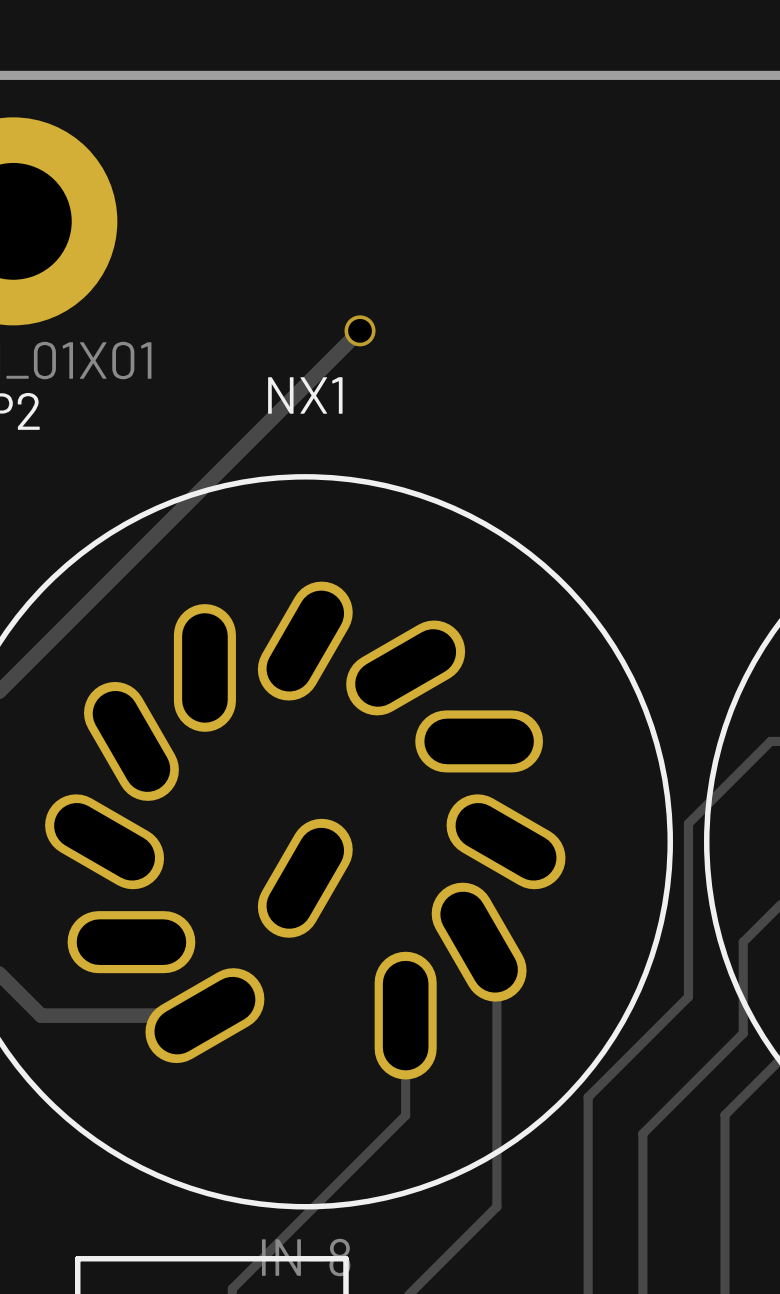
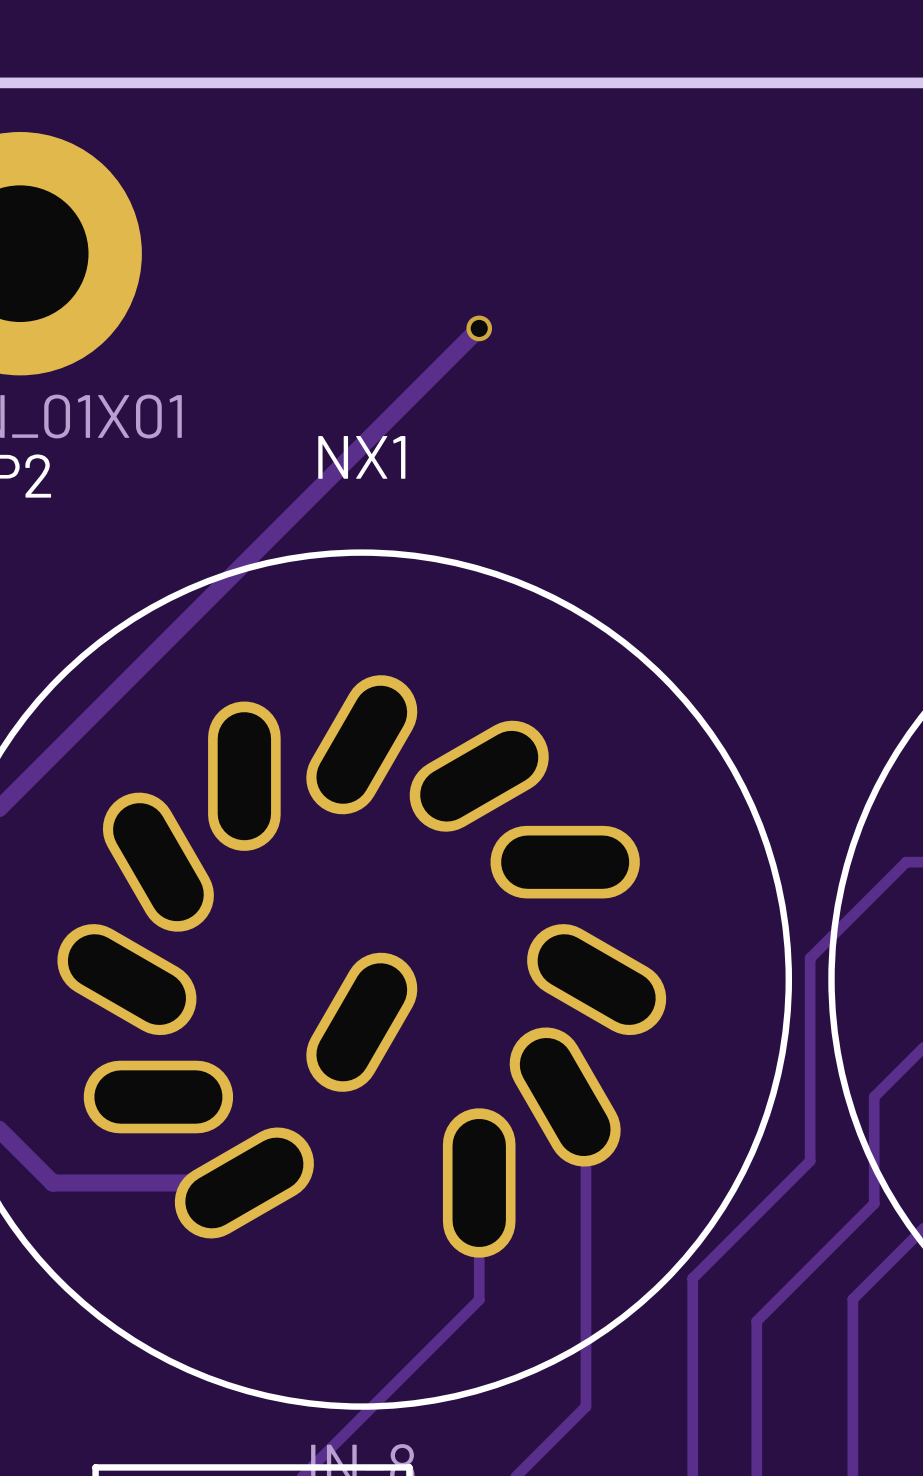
track: none -> (479, 328) (425, 381)
via: none -> (479, 328)
via: (360, 330) -> none

